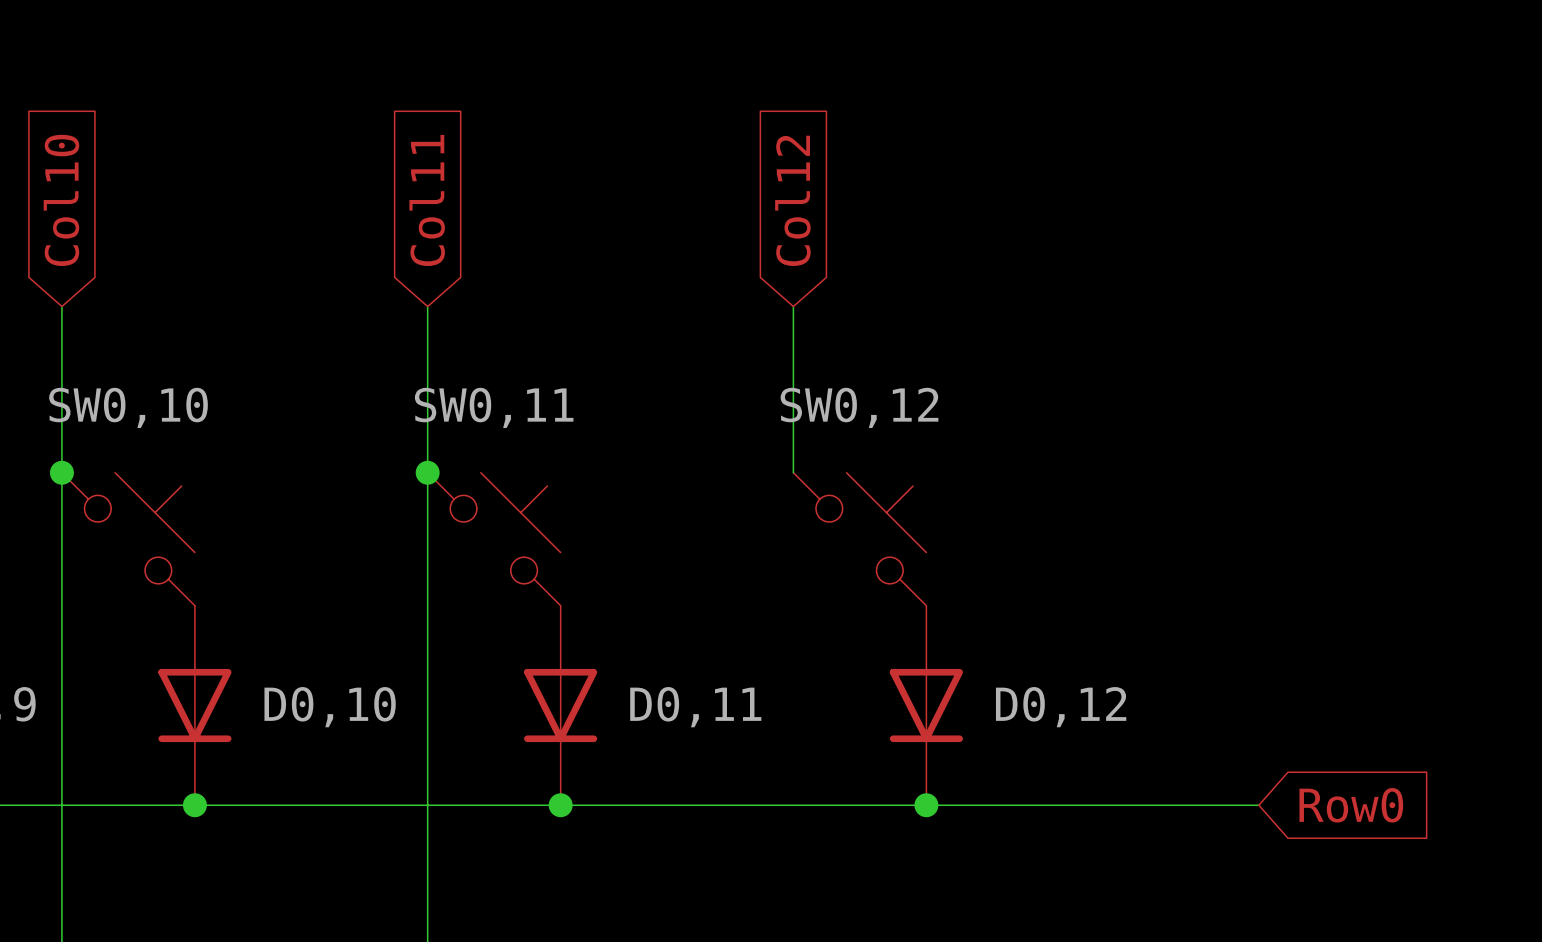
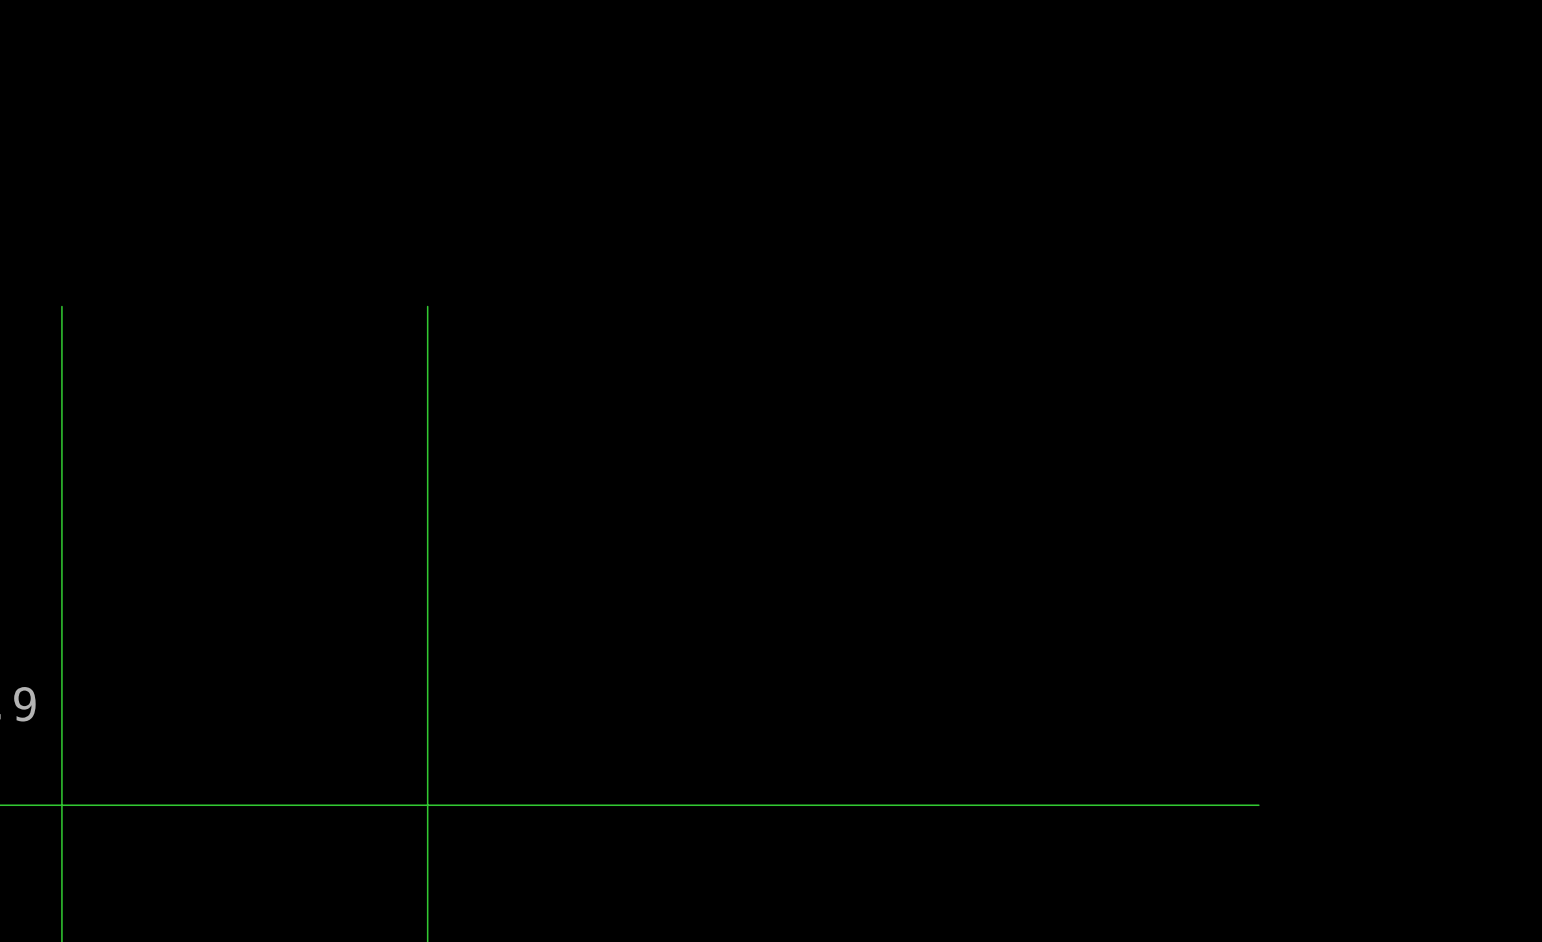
global label: Col10 (61, 200) -> none
global label: Col11 (427, 200) -> none
global label: Col12 (792, 200) -> none
wire: (793, 306) (793, 472) -> none
junction: (61, 472) -> none
junction: (427, 472) -> none
SW0,10: (128, 539) -> none
SW0,11: (494, 539) -> none
SW0,12: (859, 539) -> none
D0,10: (194, 705) -> none
D0,11: (560, 705) -> none
D0,12: (926, 705) -> none
junction: (194, 805) -> none
junction: (560, 805) -> none
junction: (926, 805) -> none
global label: Row0 (1351, 805) -> none

